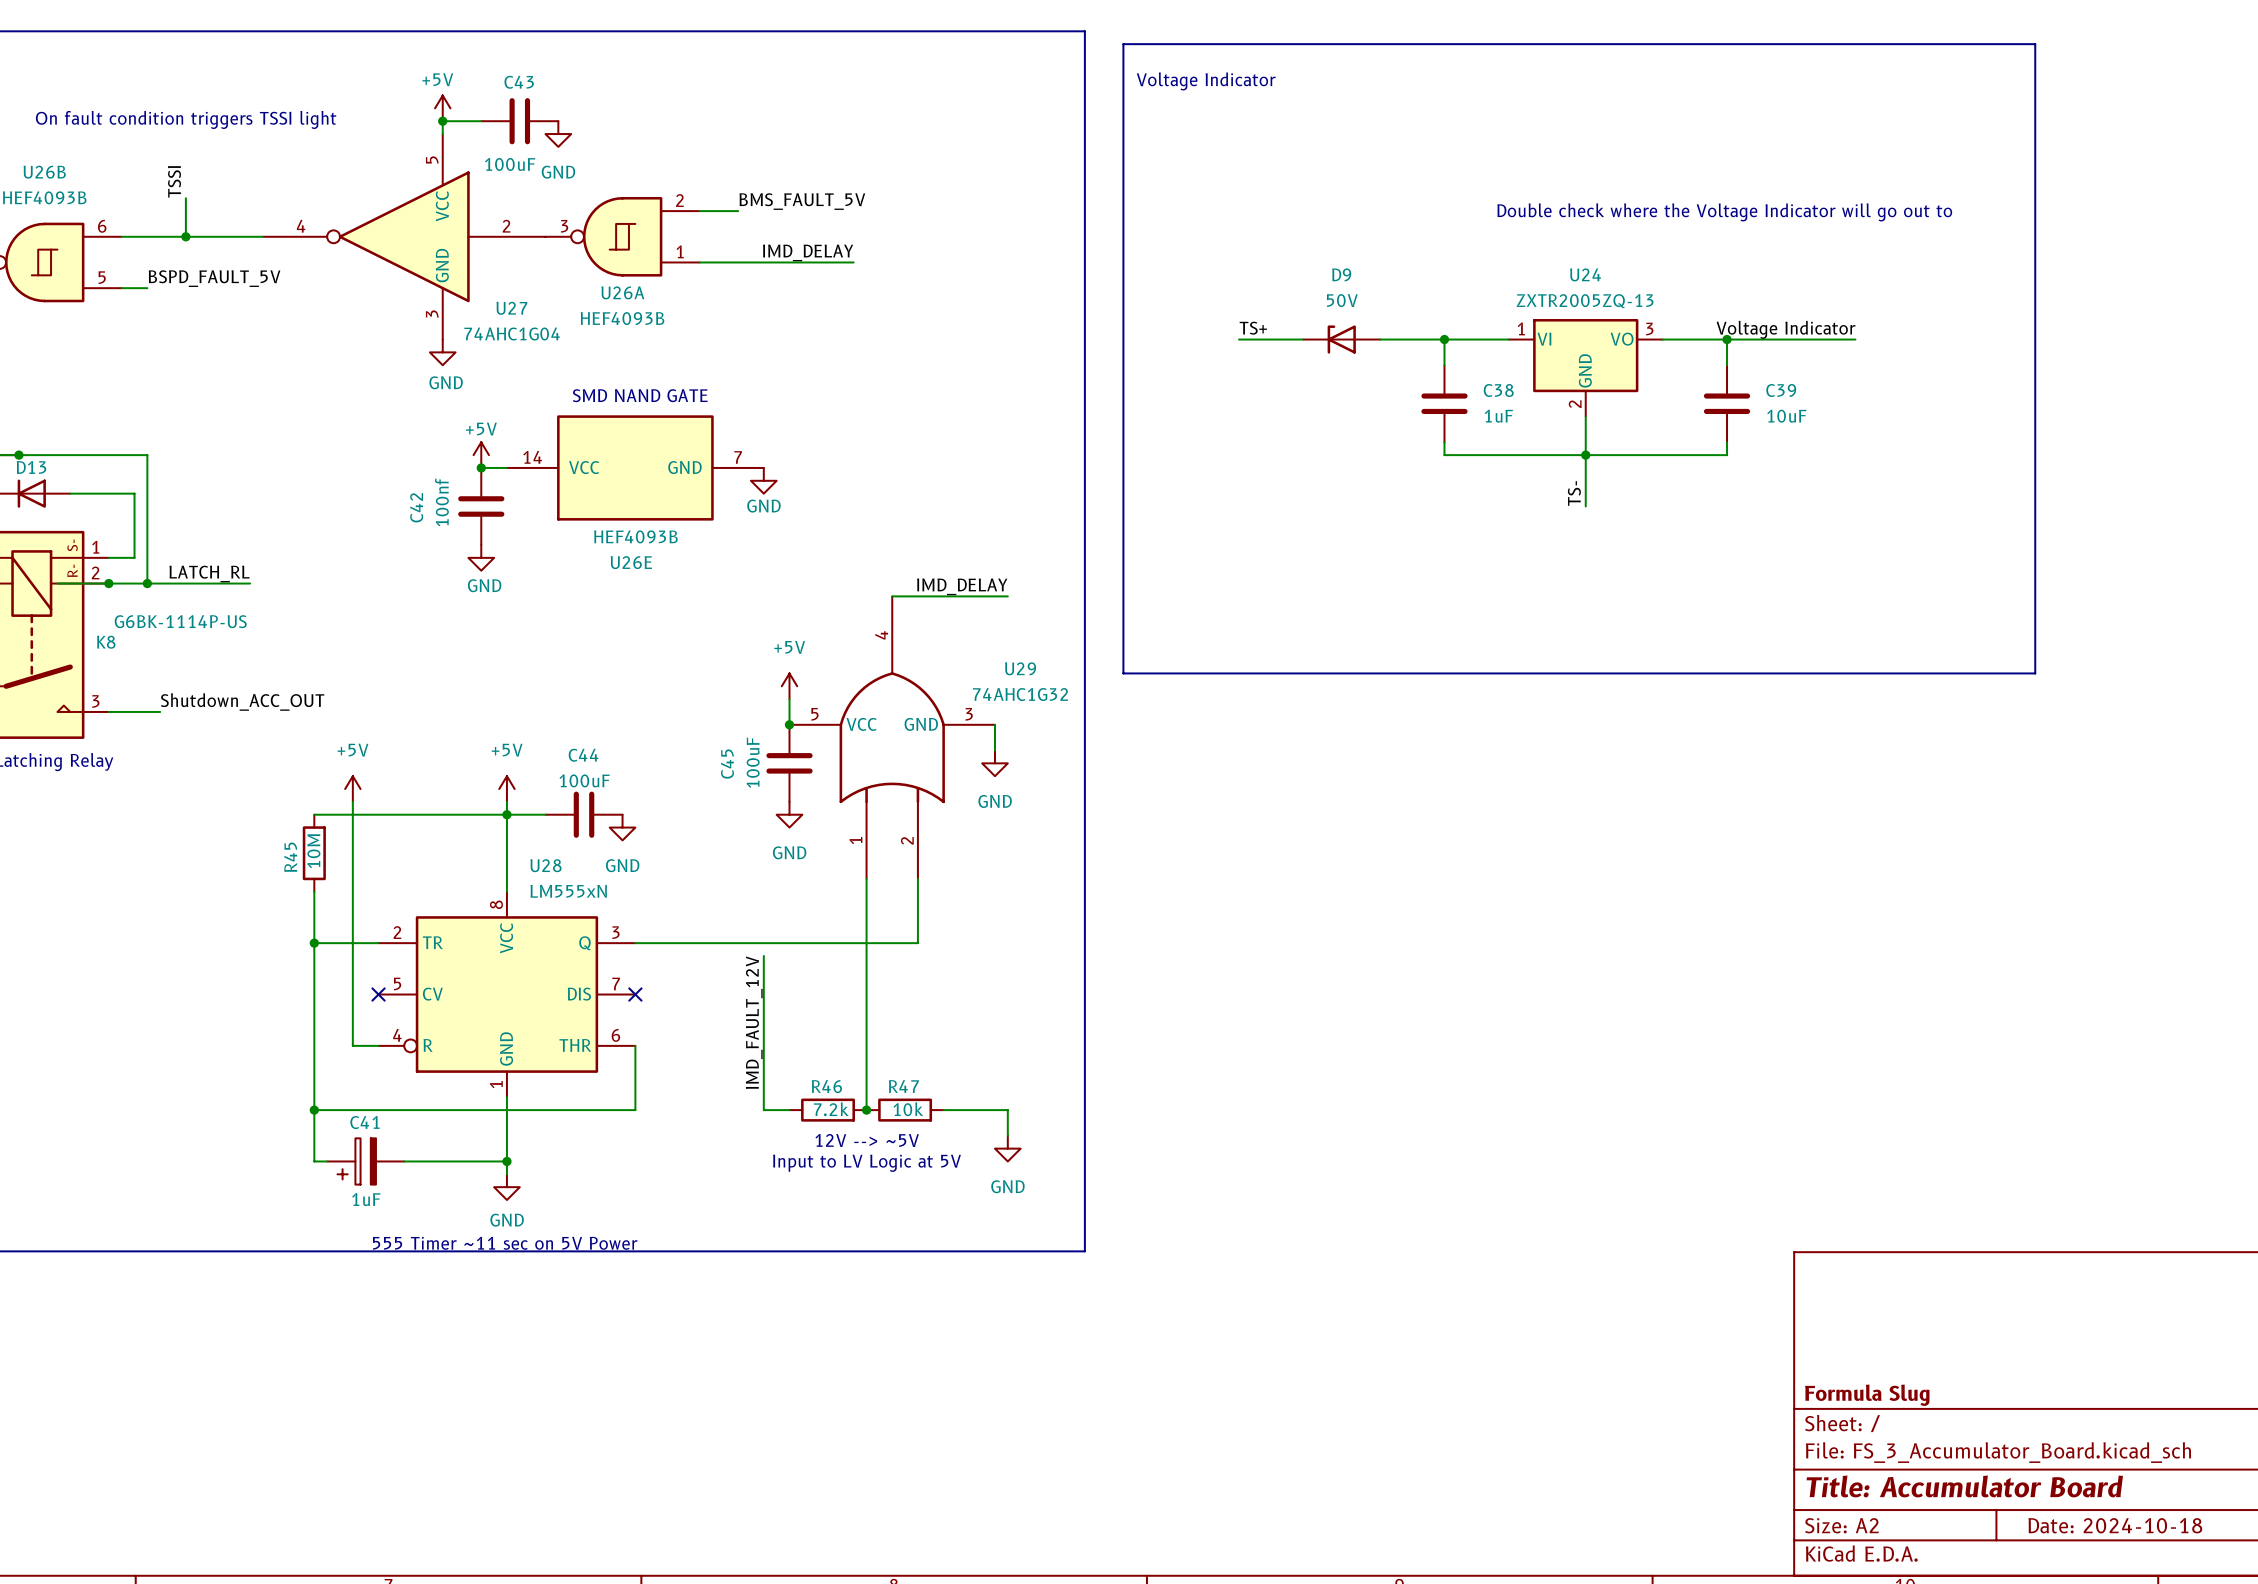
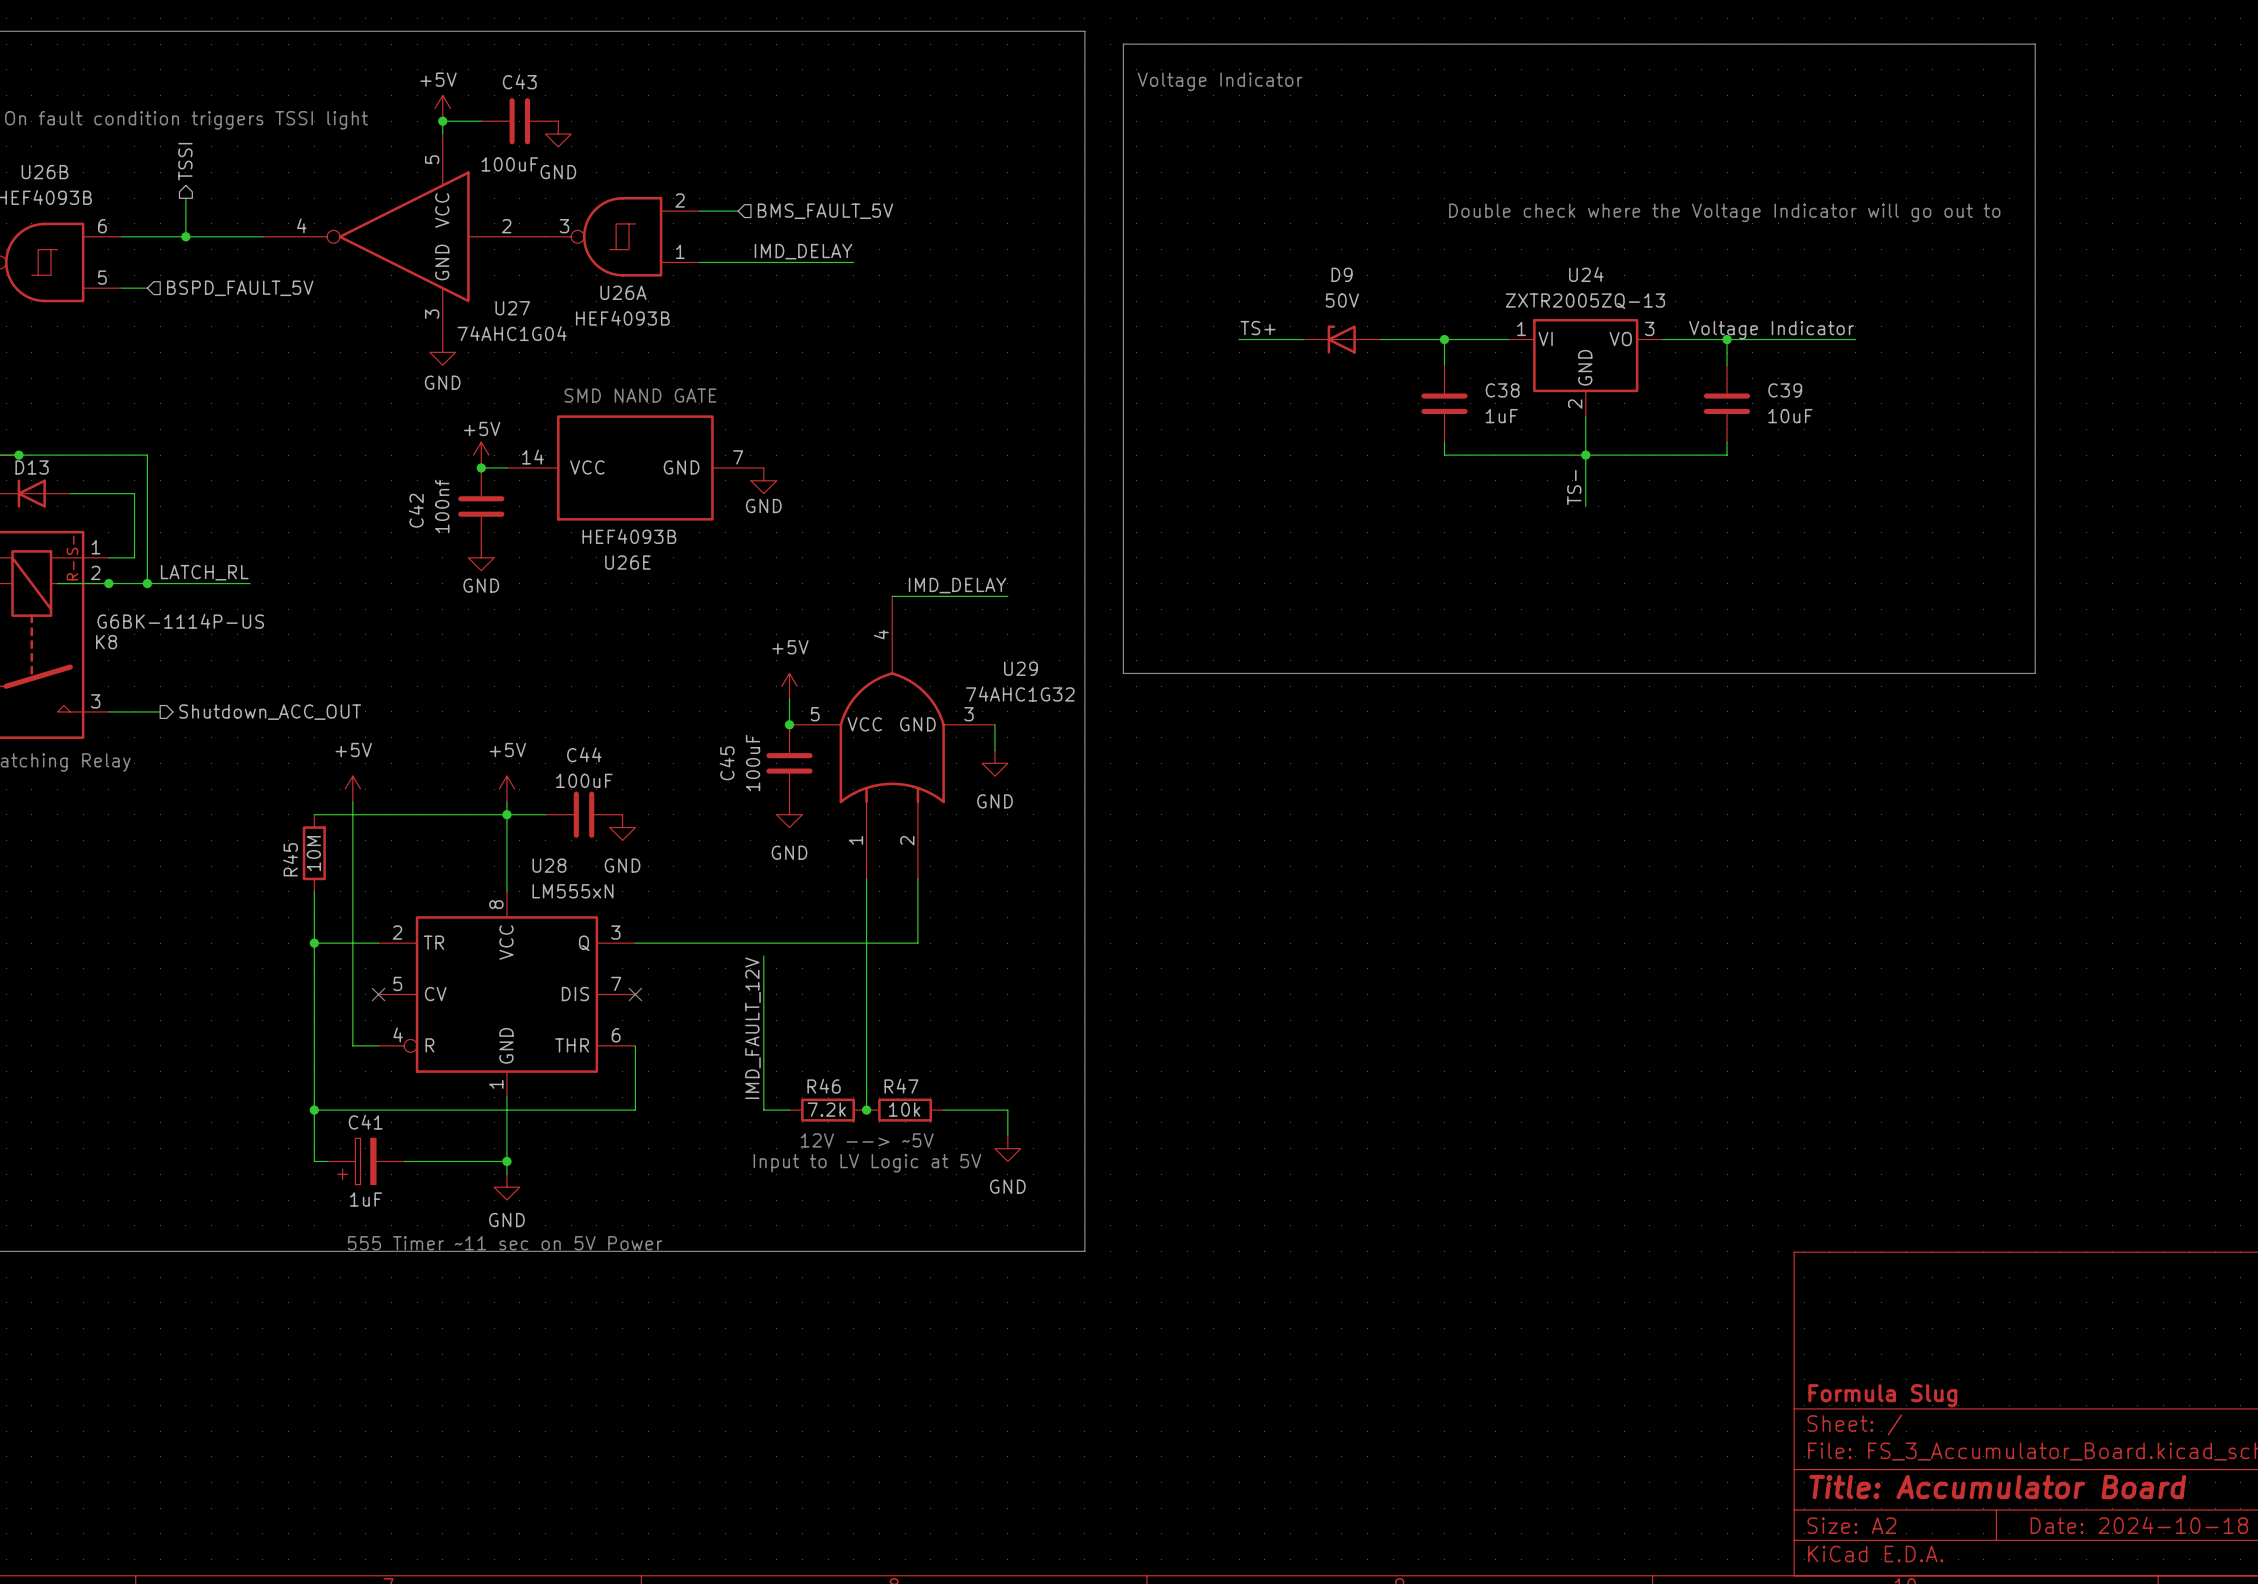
hierarchical label: none -> TSSI (185, 161)
label: TSSI (174, 181) -> none
label: BMS_FAULT_5V (802, 201) -> none
hierarchical label: none -> BMS_FAULT_5V (825, 211)
label: BSPD_FAULT_5V (214, 278) -> none
hierarchical label: none -> BSPD_FAULT_5V (240, 288)
label: Shutdown_ACC_OUT (242, 702) -> none
hierarchical label: none -> Shutdown_ACC_OUT (270, 712)

